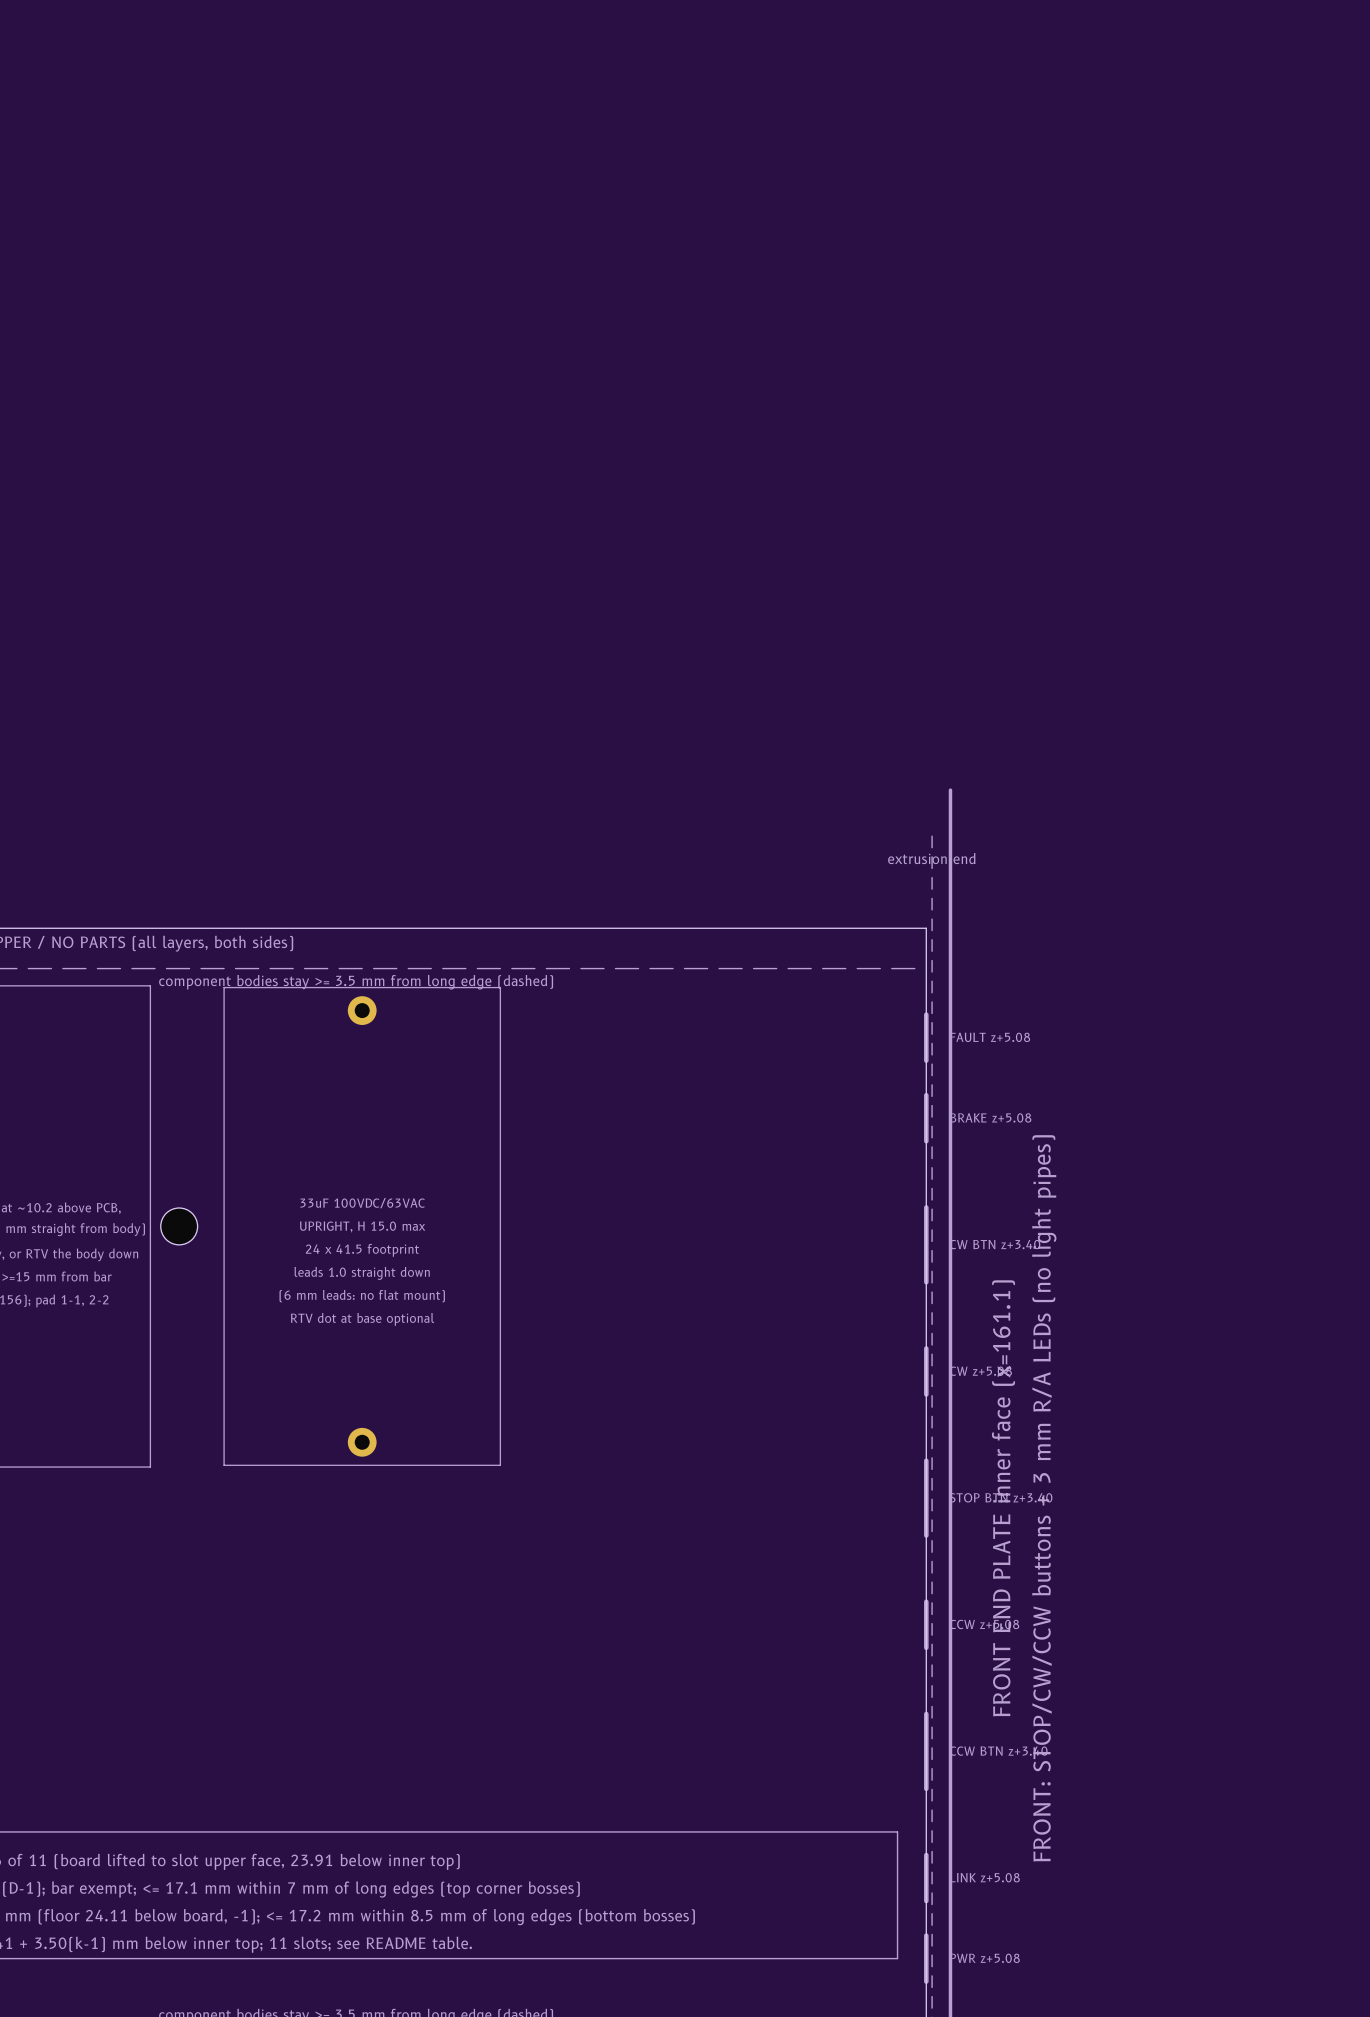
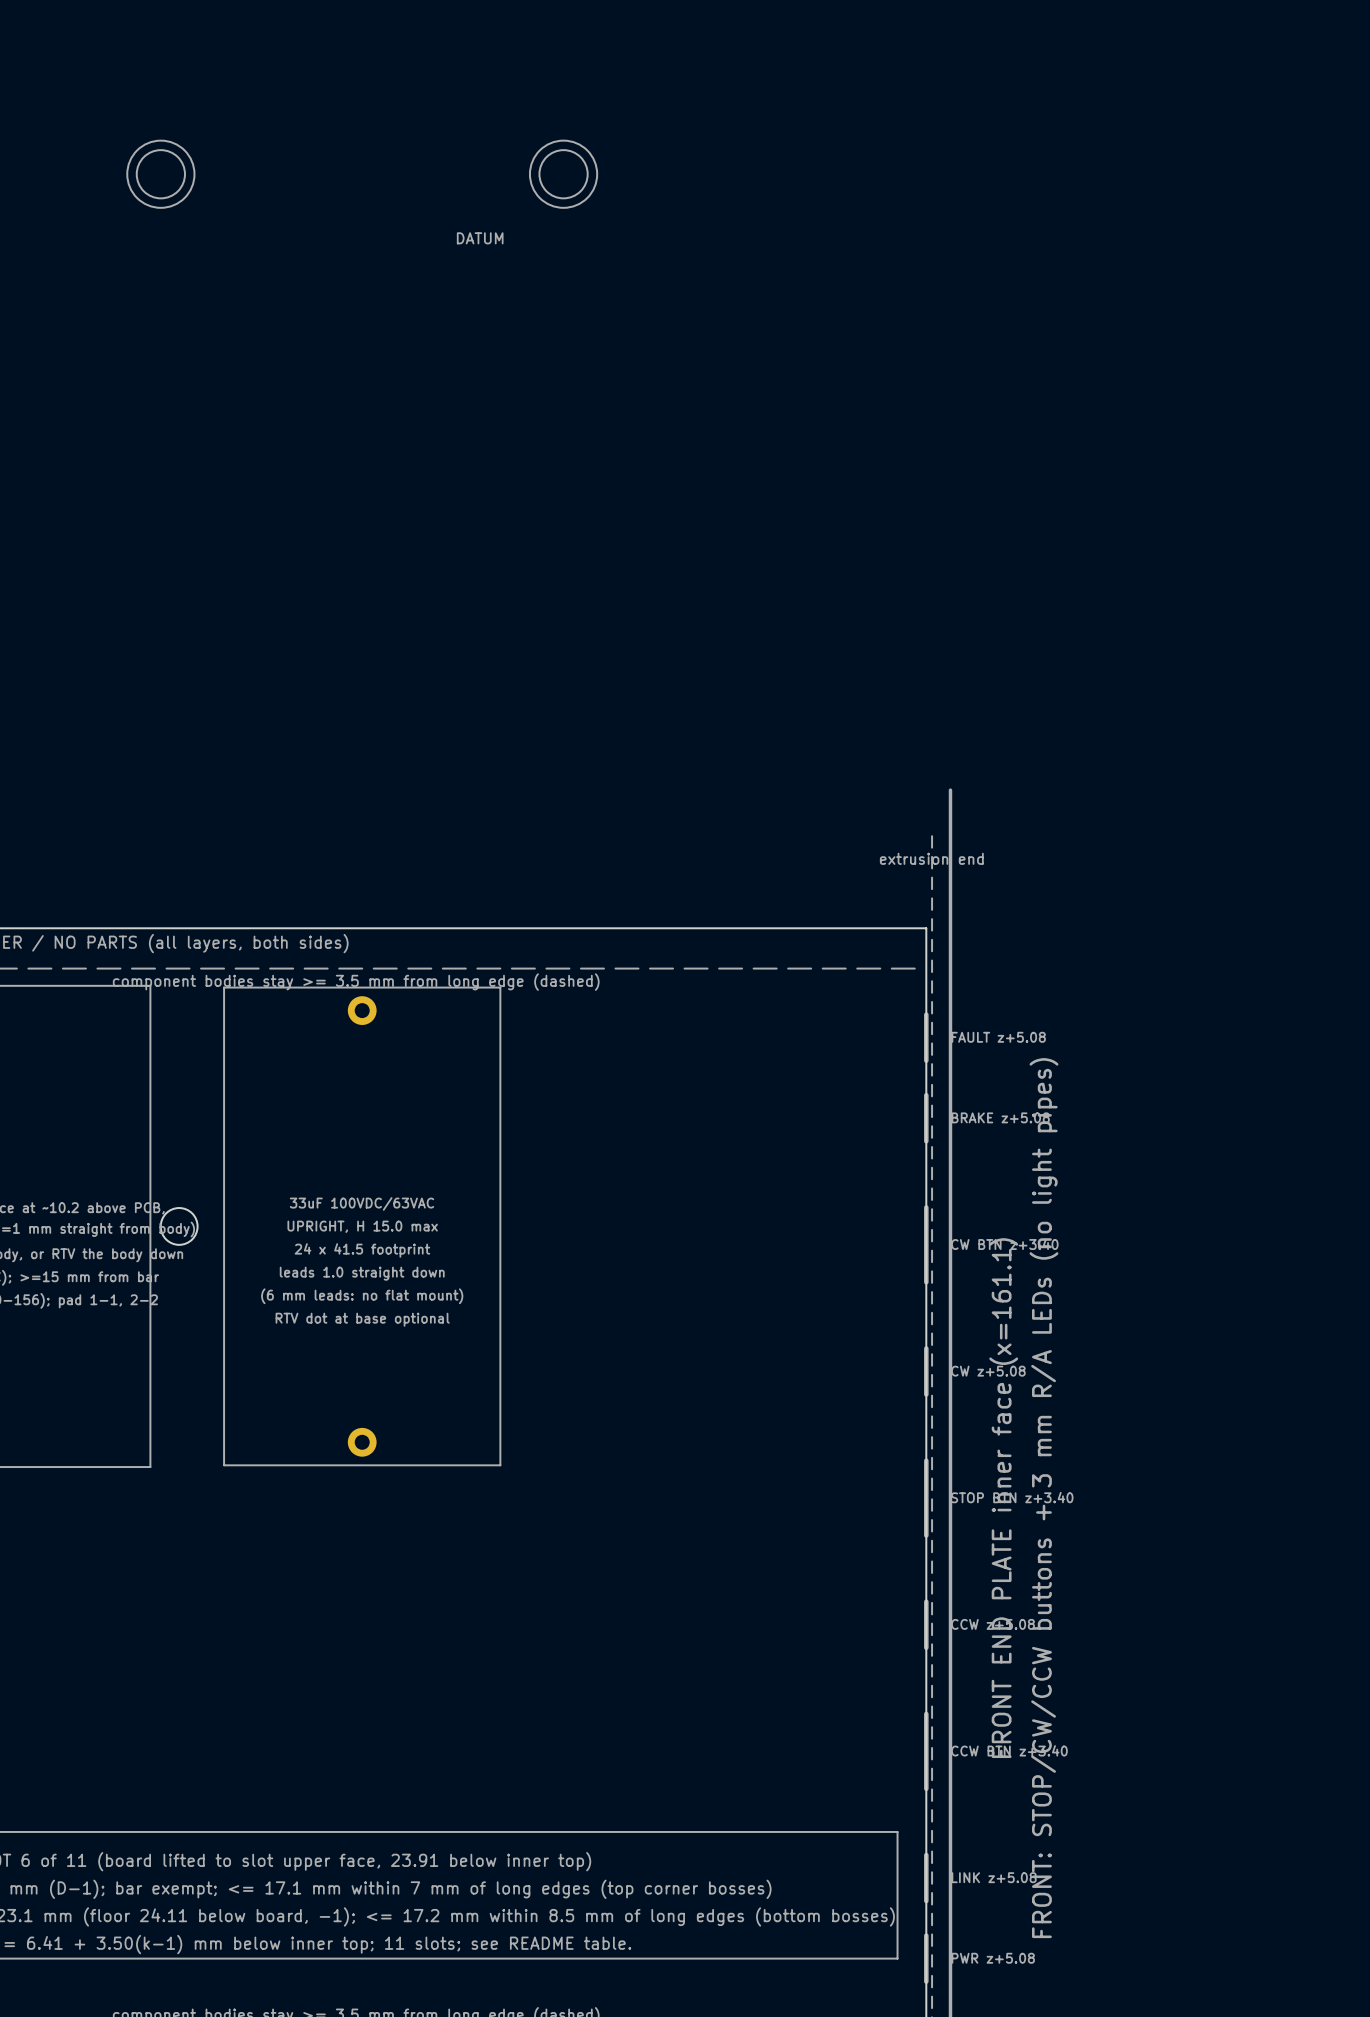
drawing: none -> [126, 140, 195, 209]
drawing: none -> [529, 140, 598, 209]
text: none -> DATUM (480, 238)

